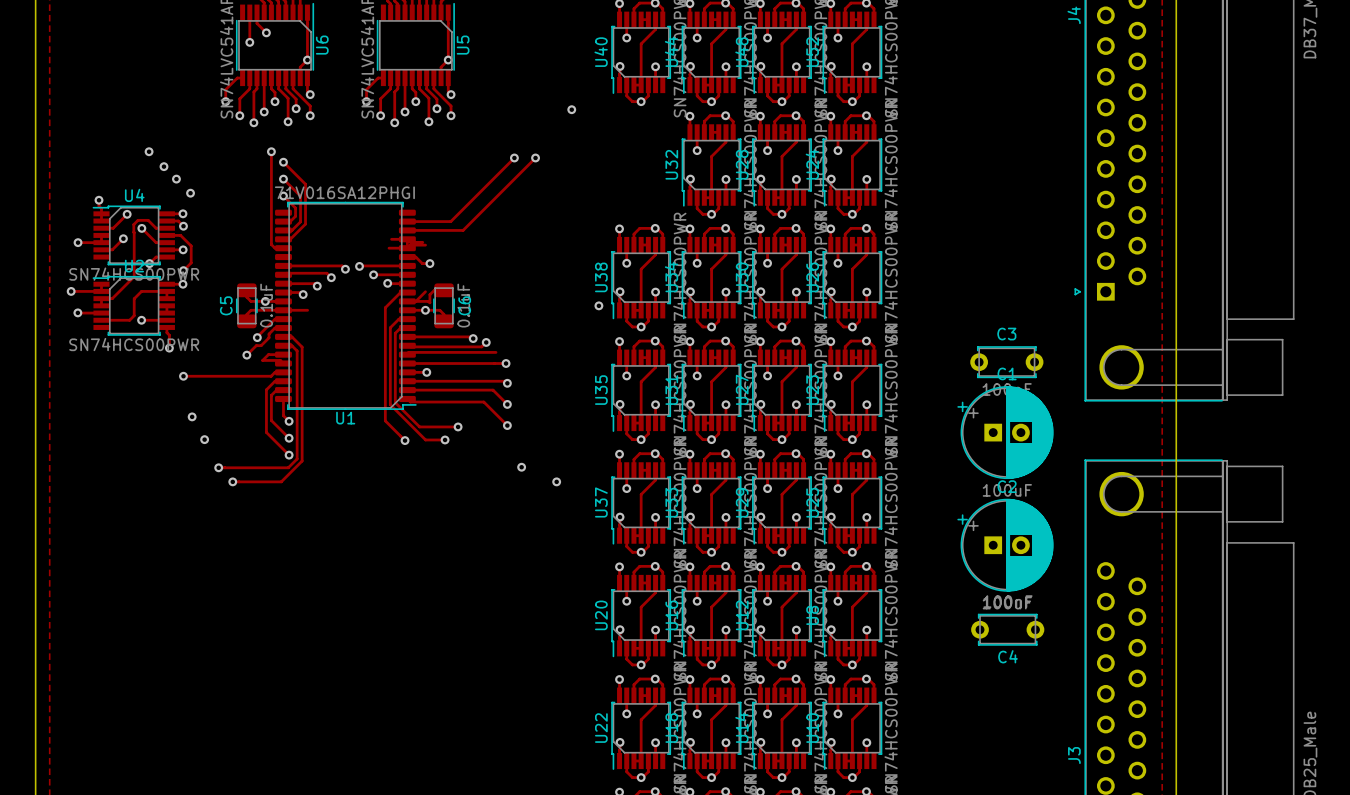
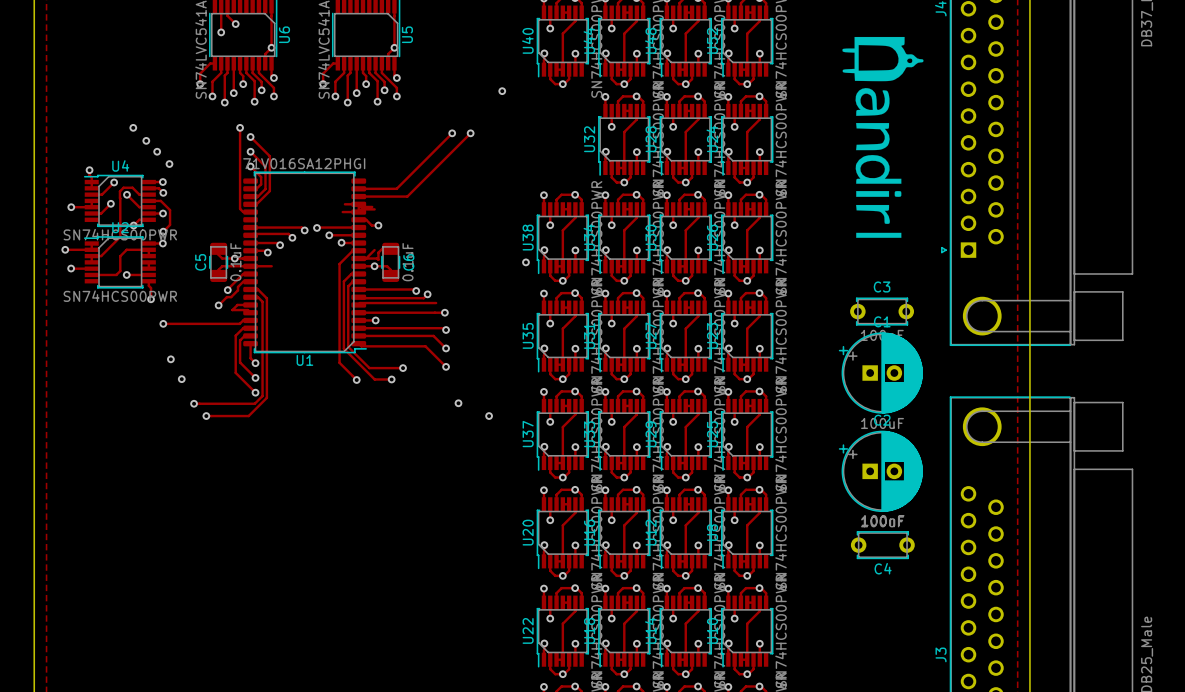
drawing: none -> [842, 36, 924, 238]

